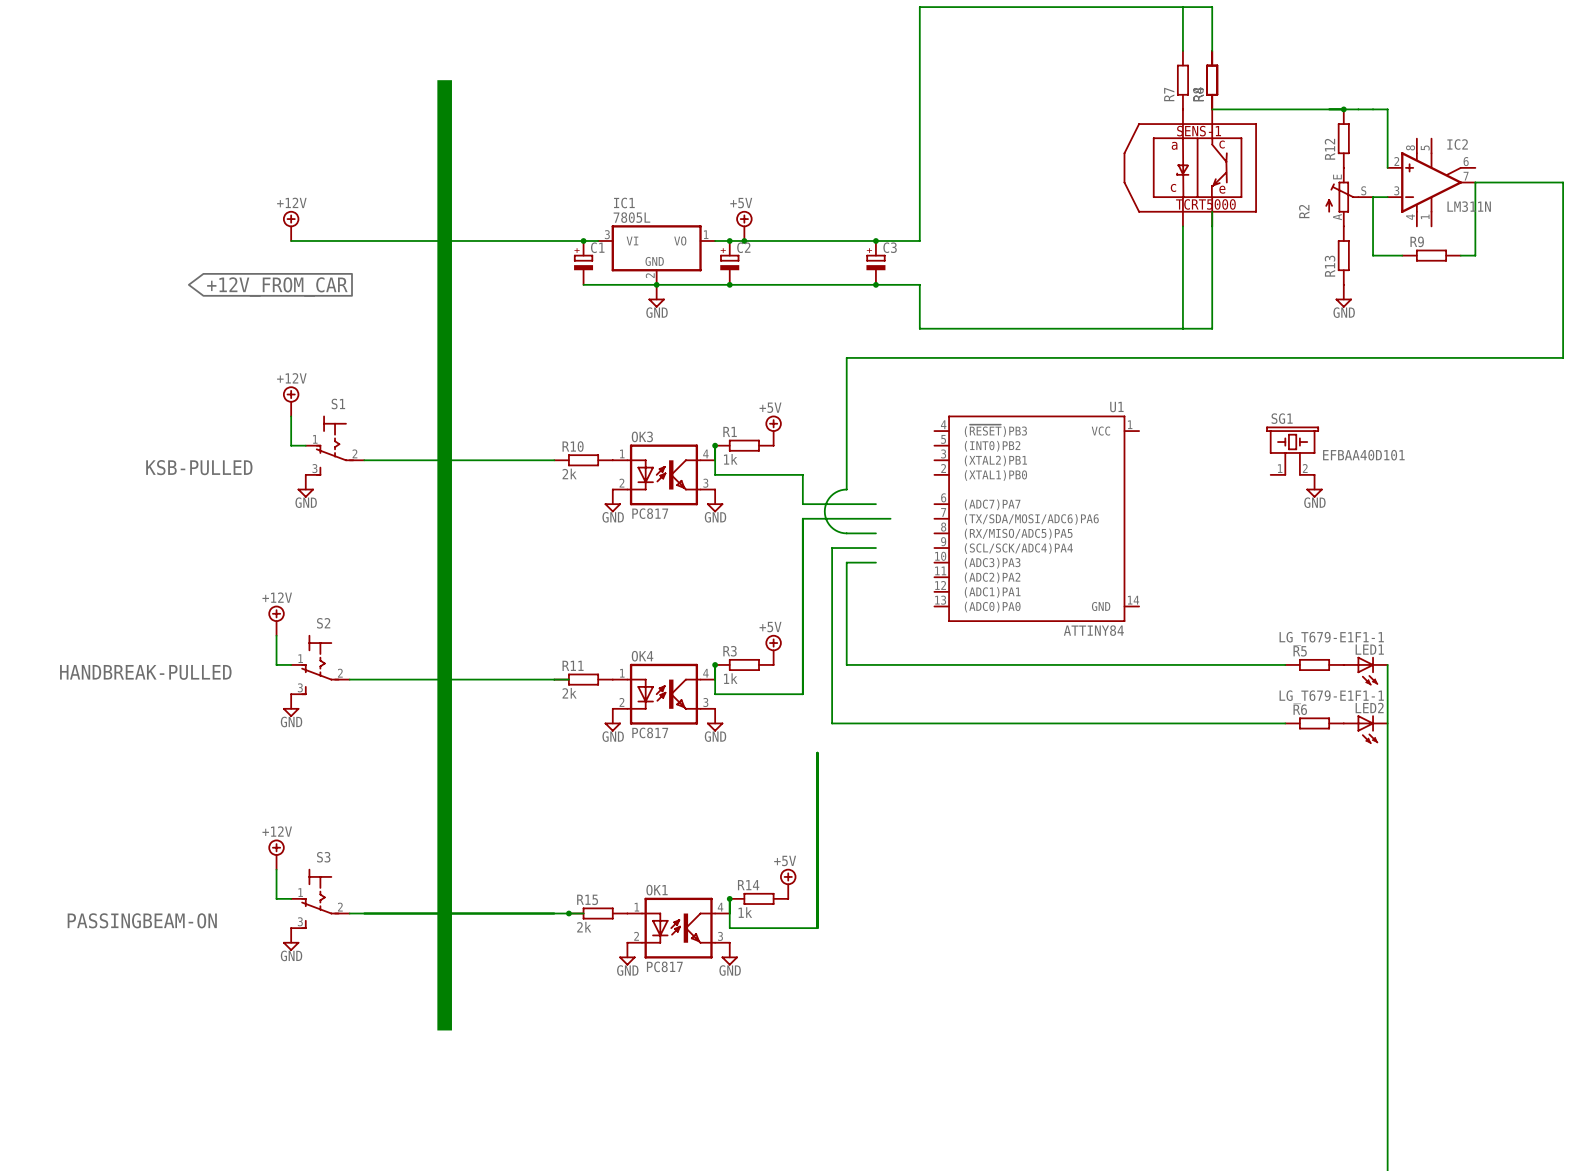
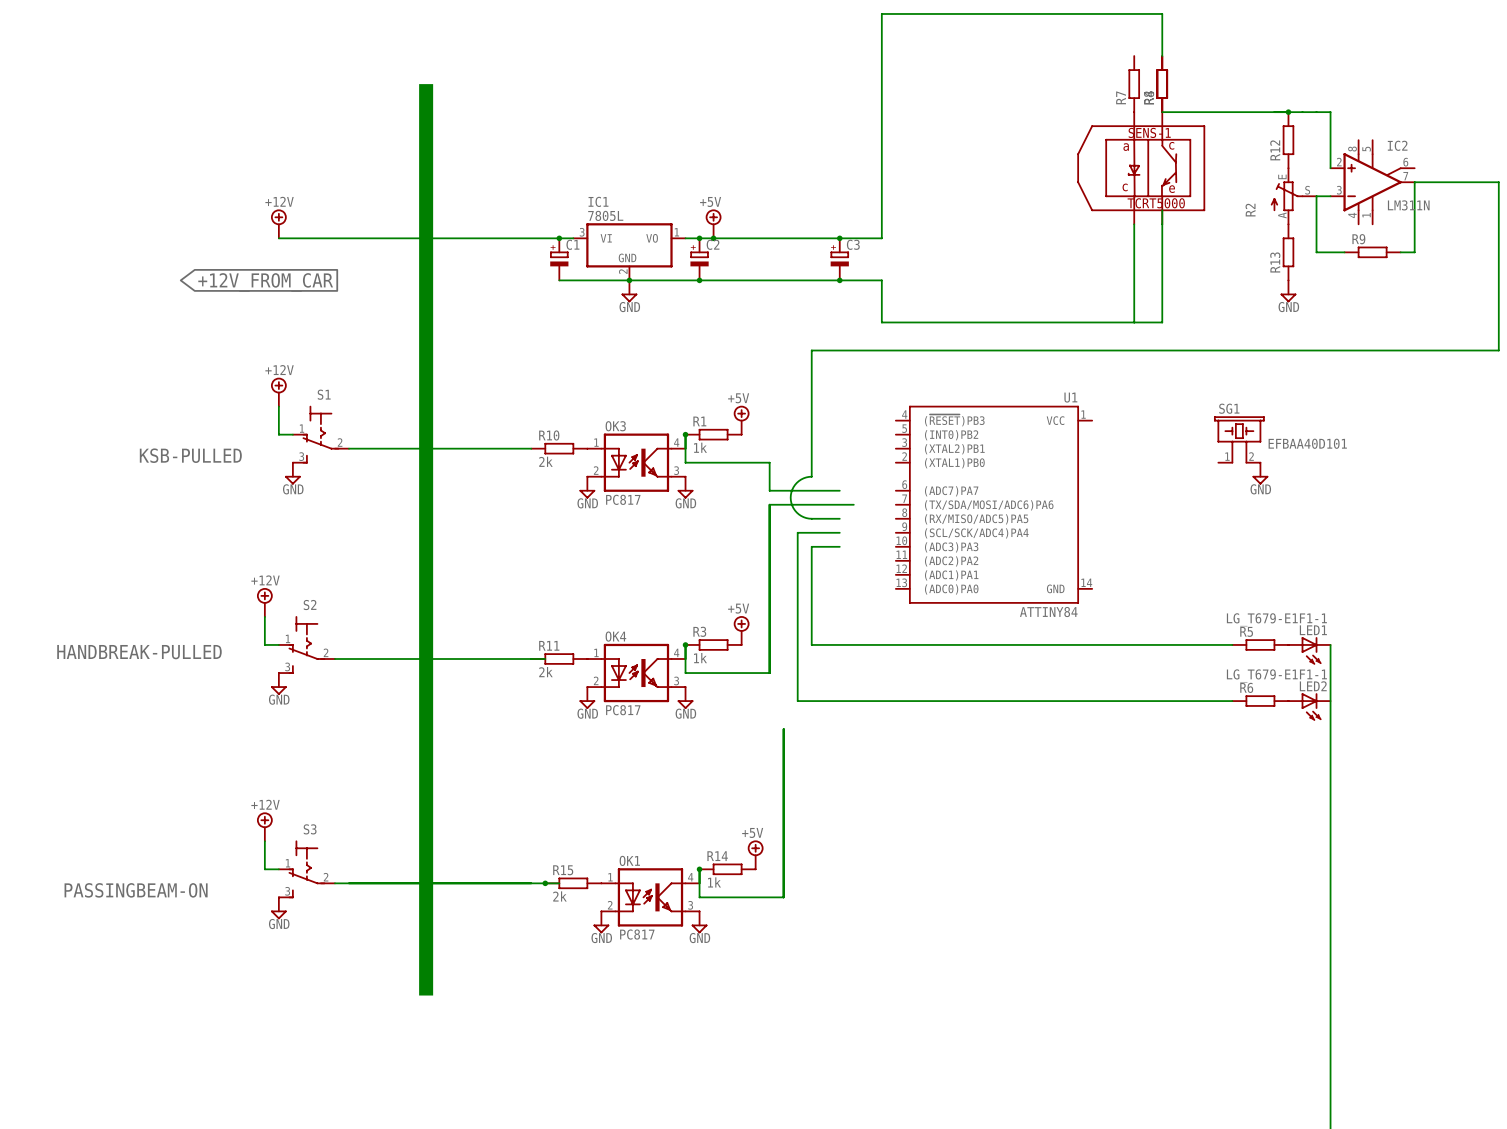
wire: (1182, 7) (1182, 50) -> none

